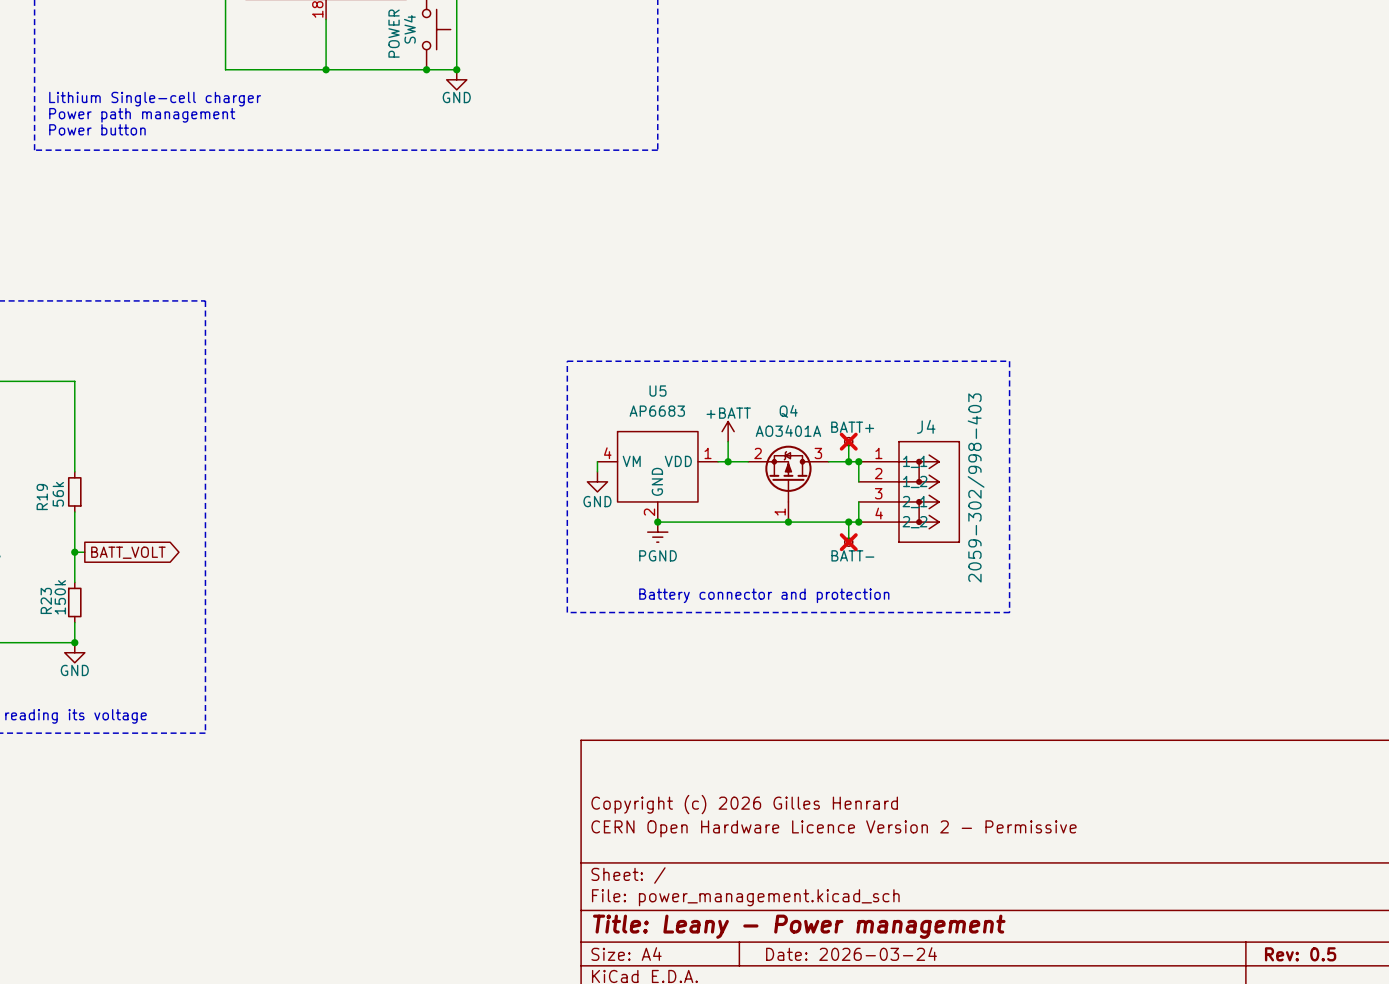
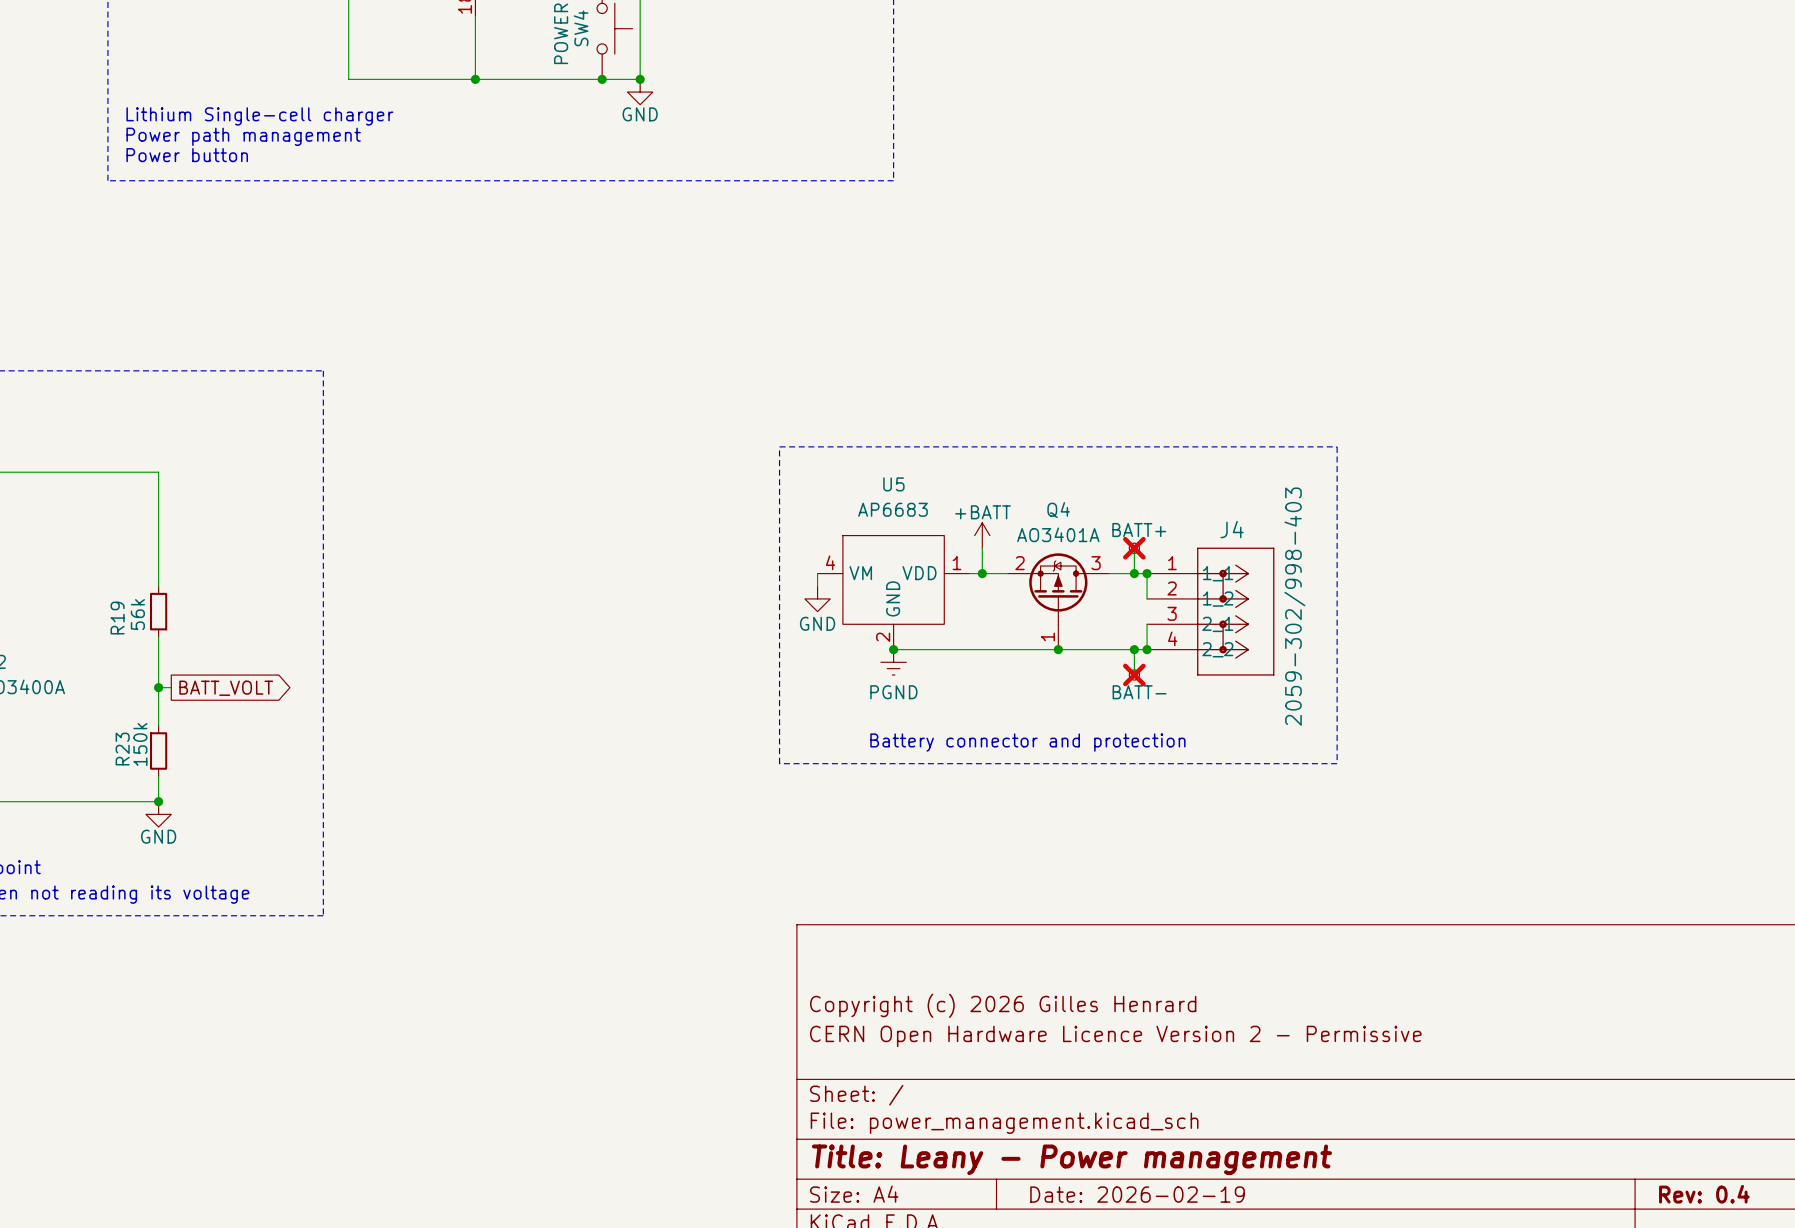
title block: Date: 2026-03-24 (851, 954) -> Date: 2026-02-19 (1137, 1194)
title block: Rev: 0.5 (1300, 954) -> Rev: 0.4 (1704, 1194)

